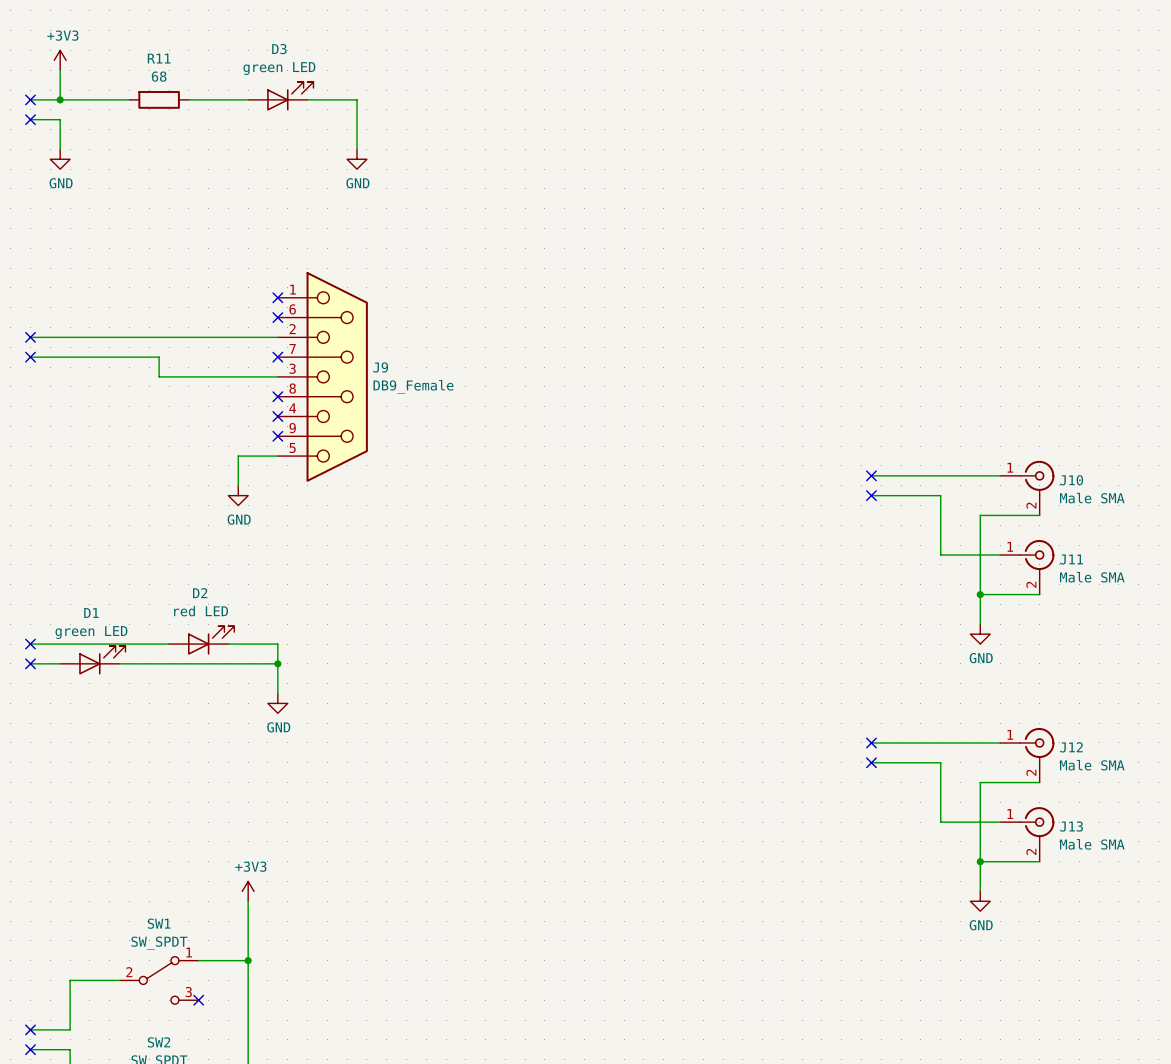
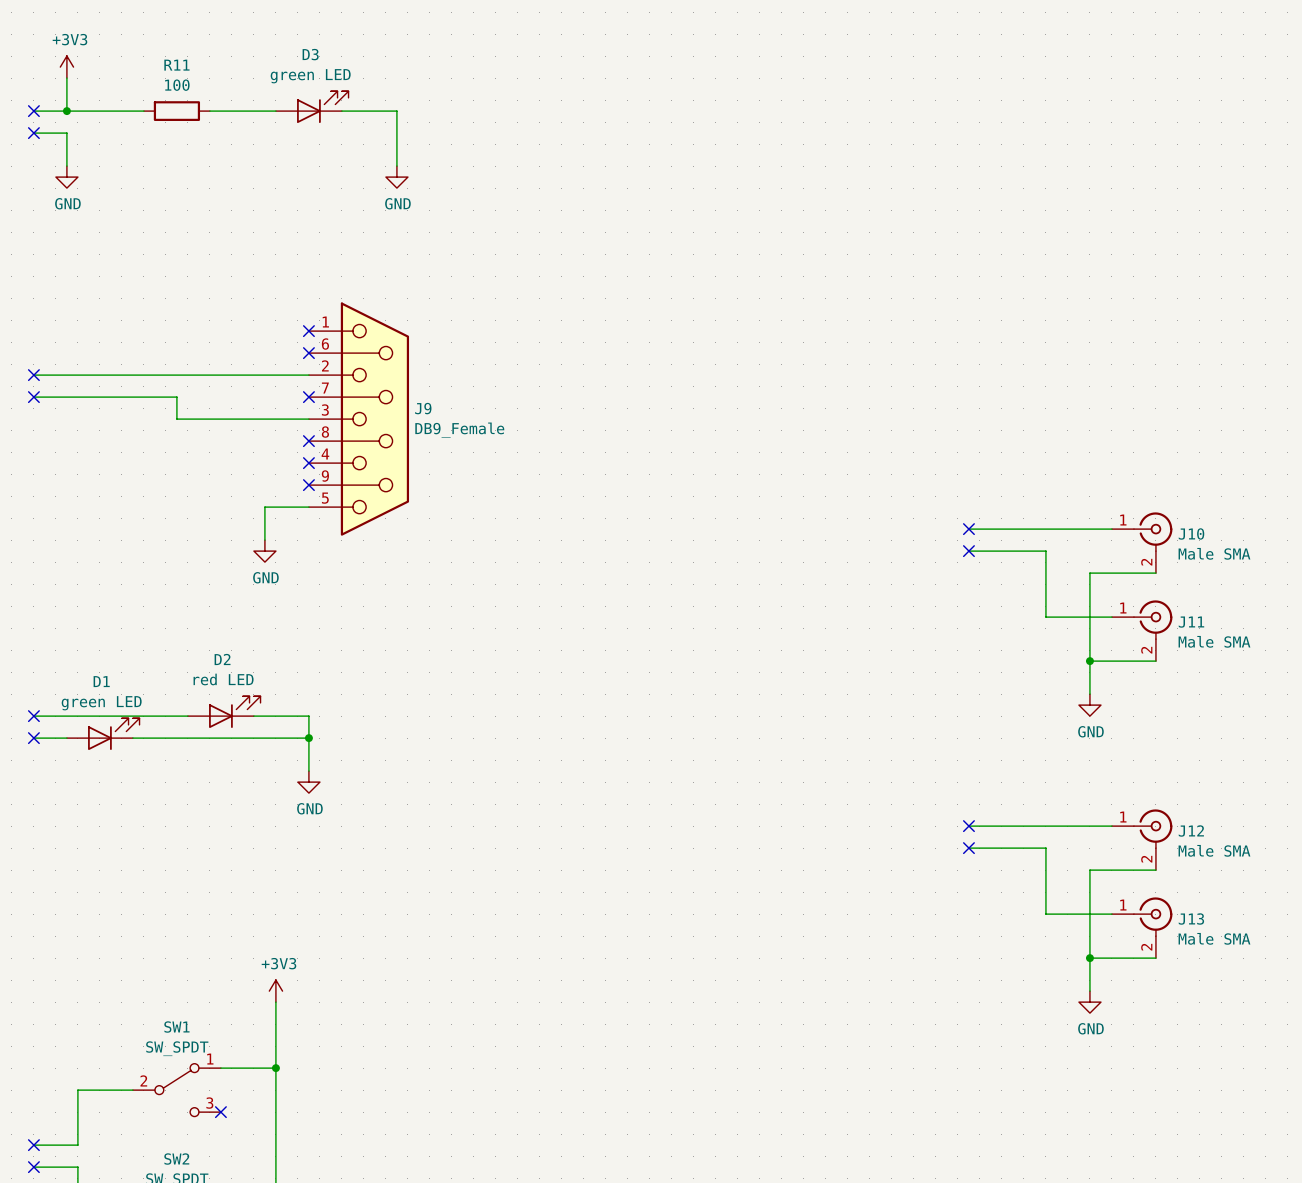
R11 value: 68 (159, 76) -> 100 (177, 85)

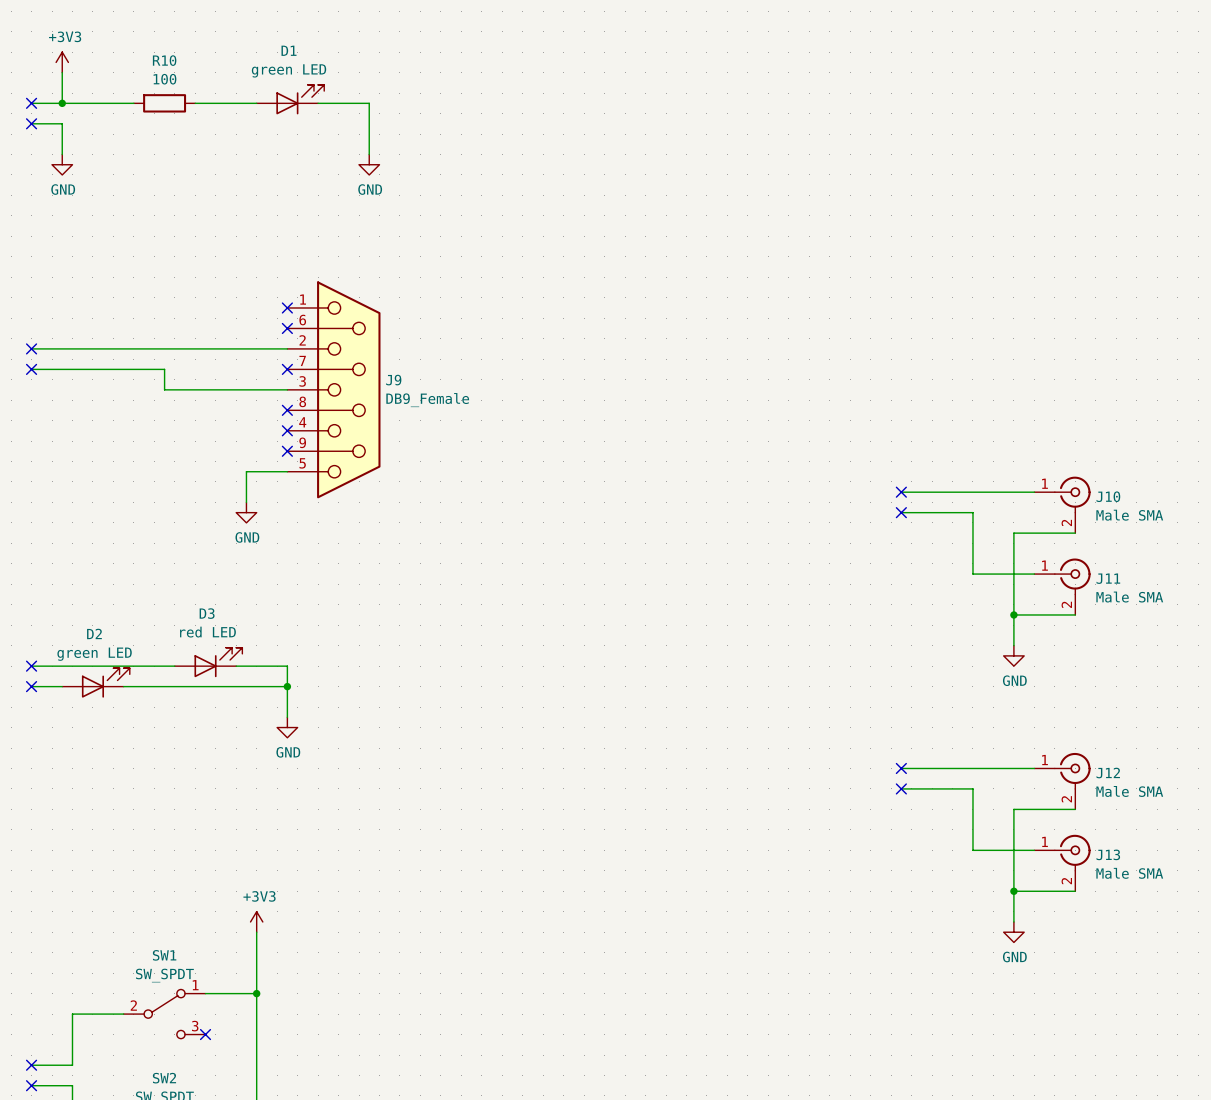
D3 name: D3 (310, 54) -> D1 (289, 50)
R11 name: R11 (176, 65) -> R10 (164, 60)
D2 name: D2 (222, 659) -> D3 (207, 613)
D1 name: D1 (101, 681) -> D2 (94, 633)

